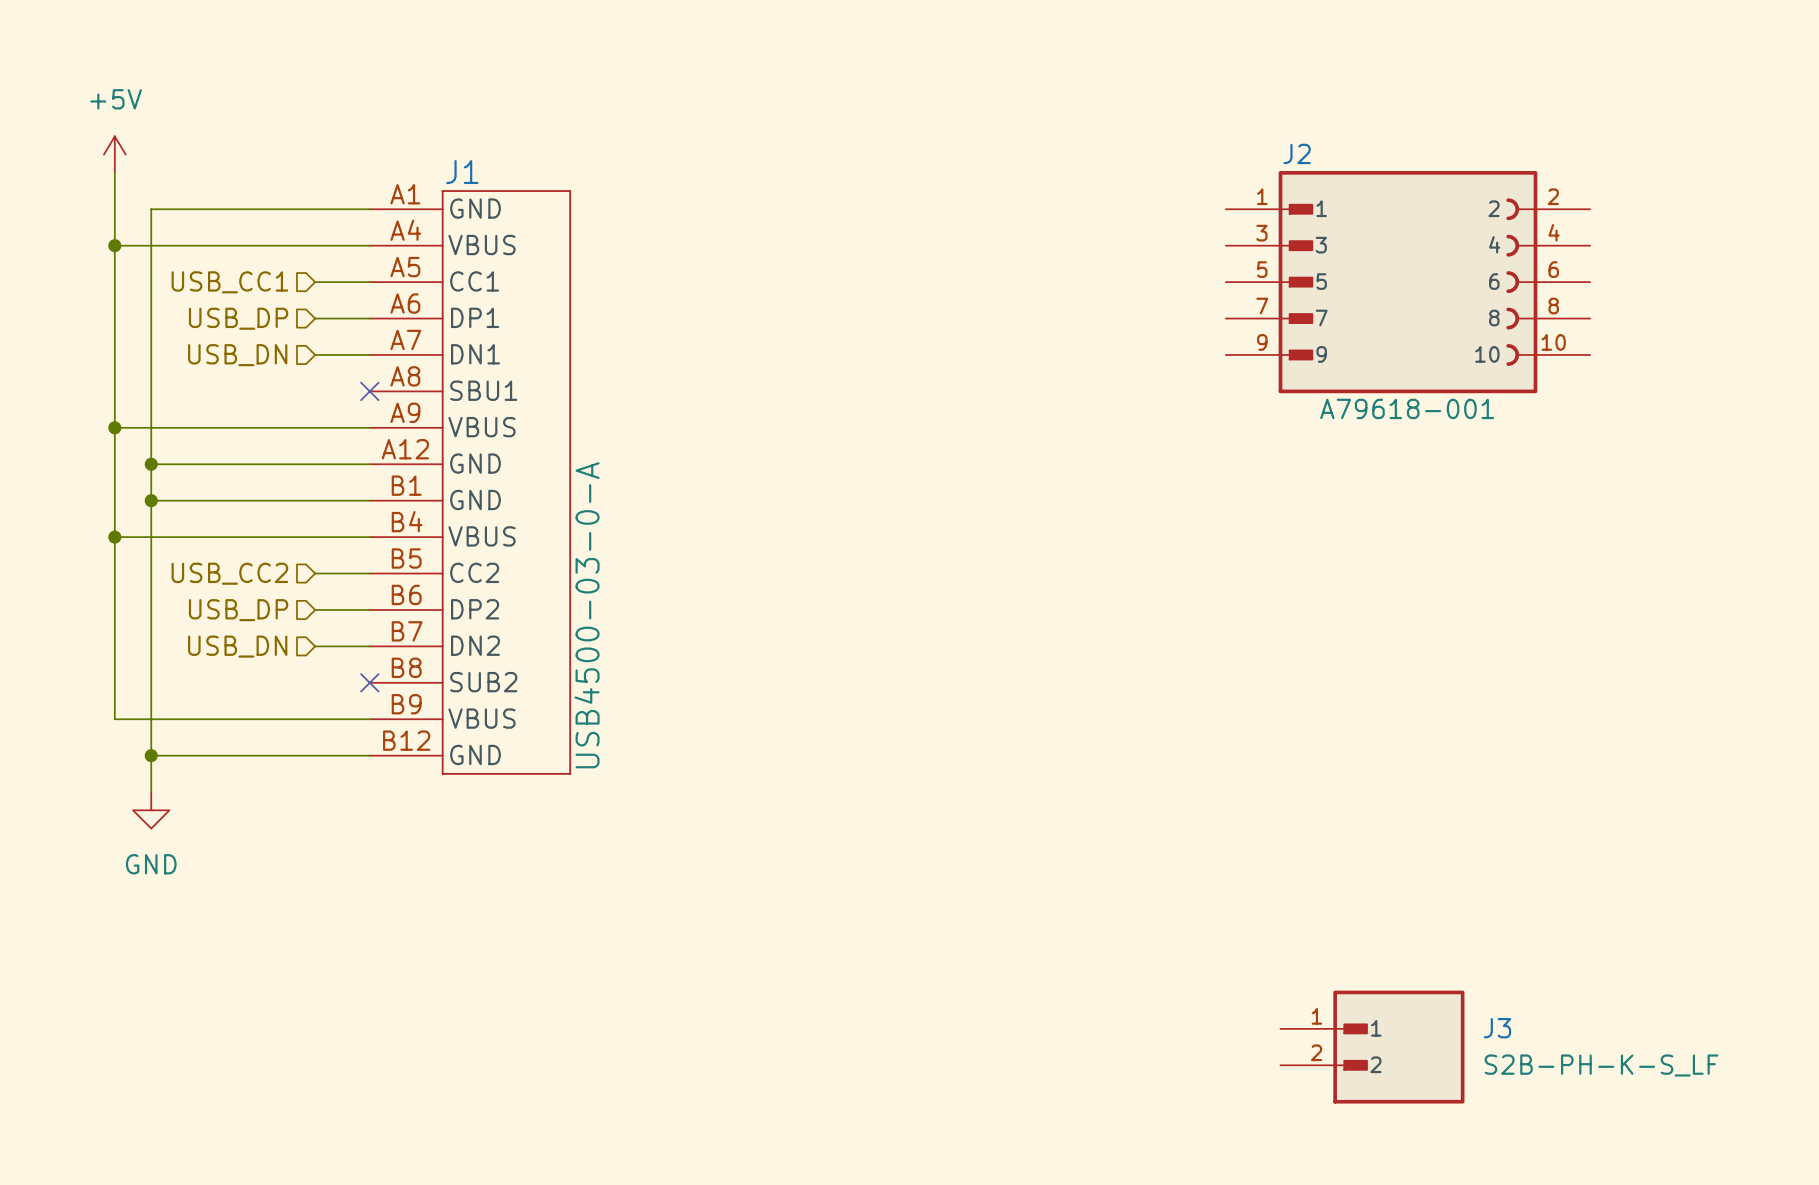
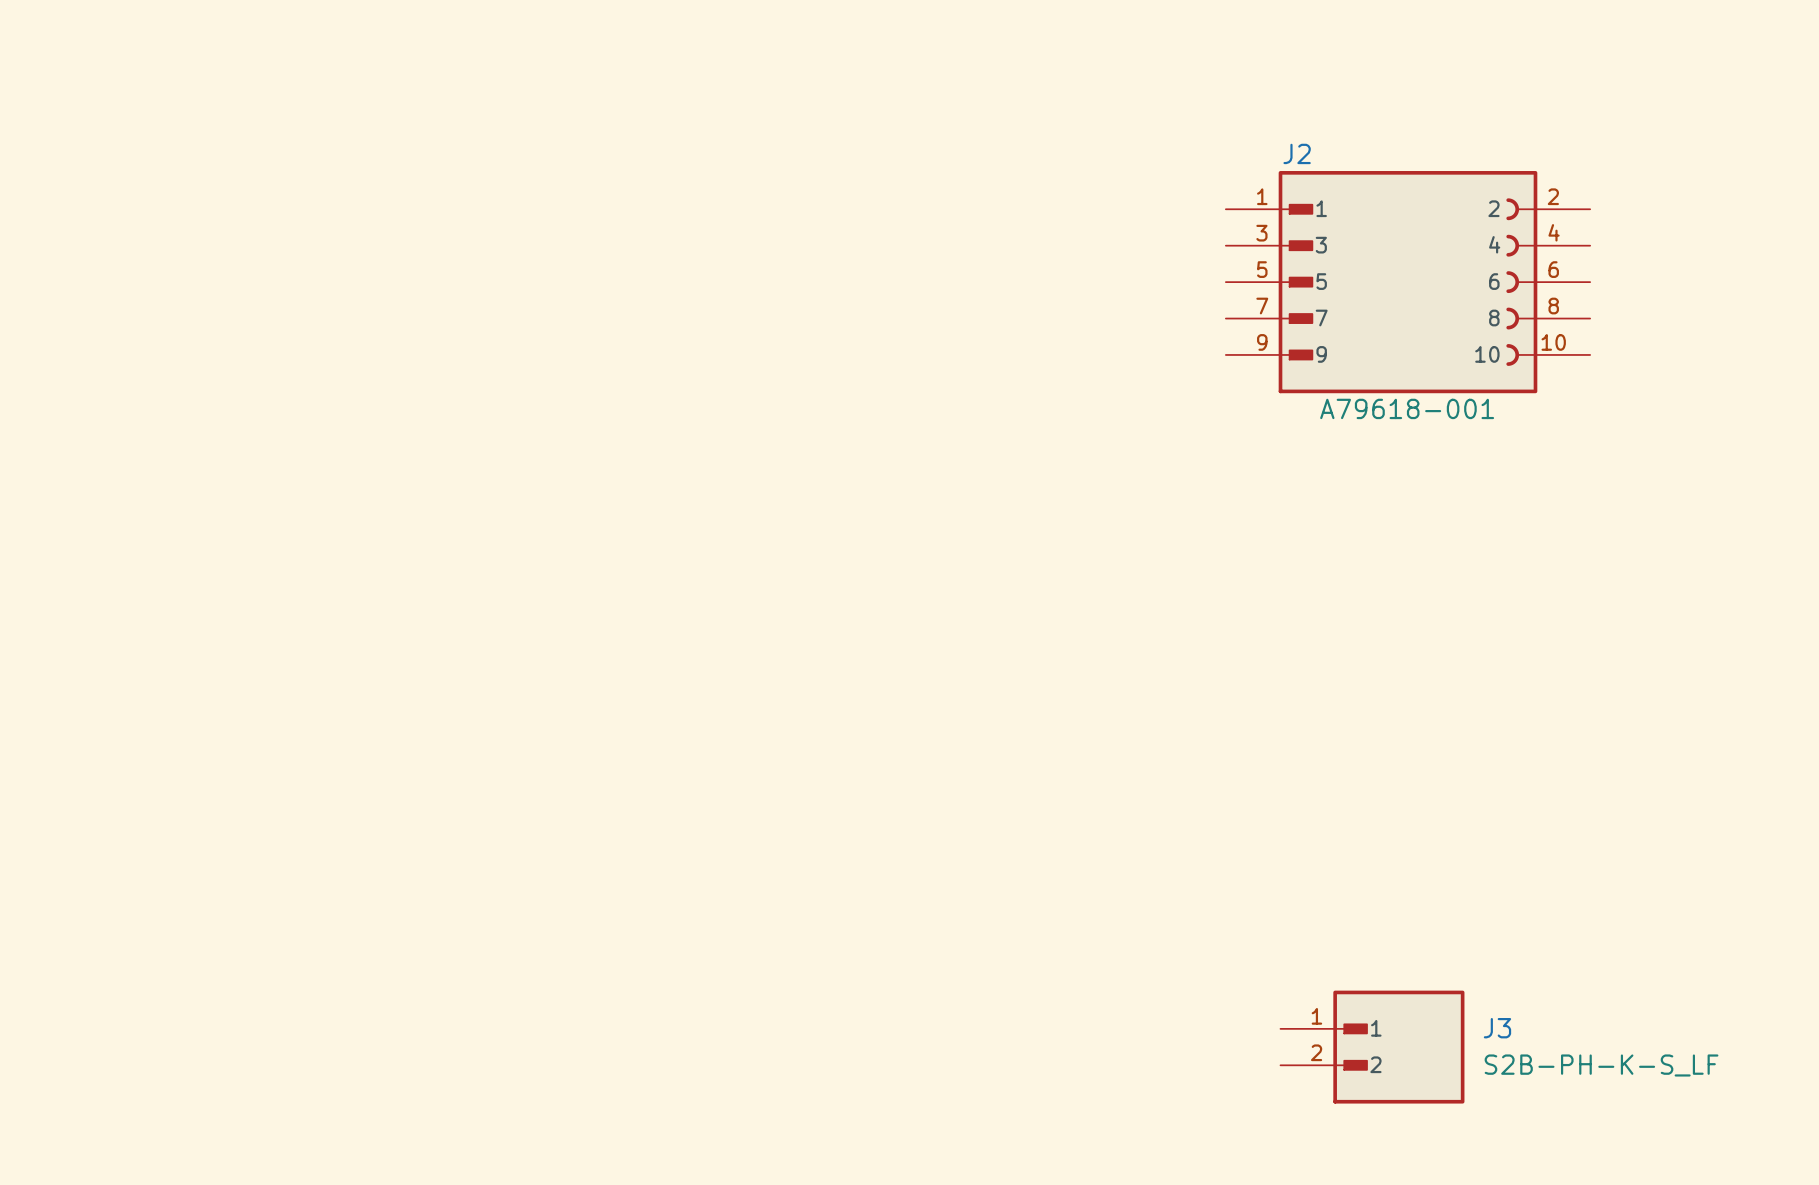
power symbol: +5V (114, 154) -> none
wire: (114, 172) (114, 719) (369, 719) -> none
wire: (369, 209) (151, 209) (151, 792) -> none
wire: (114, 245) (369, 245) -> none
junction: (114, 245) -> none
hierarchical label: USB_CC1 (229, 282) -> none
wire: (315, 282) (369, 282) -> none
hierarchical label: USB_DP (238, 318) -> none
wire: (315, 318) (369, 318) -> none
wire: (315, 354) (369, 354) -> none
hierarchical label: USB_DN (237, 355) -> none
no-connect mark: (369, 391) -> none
wire: (114, 427) (369, 427) -> none
junction: (114, 427) -> none
wire: (151, 464) (369, 464) -> none
junction: (151, 464) -> none
J1: USB4500-03-0-A (470, 482) -> none
wire: (151, 500) (369, 500) -> none
junction: (151, 500) -> none
wire: (114, 537) (369, 537) -> none
junction: (114, 537) -> none
hierarchical label: USB_CC2 (229, 573) -> none
wire: (315, 573) (369, 573) -> none
wire: (315, 609) (369, 609) -> none
hierarchical label: USB_DP (238, 610) -> none
hierarchical label: USB_DN (237, 646) -> none
wire: (315, 646) (369, 646) -> none
no-connect mark: (369, 682) -> none
wire: (151, 755) (369, 755) -> none
junction: (151, 755) -> none
power symbol: GND (151, 810) -> none

